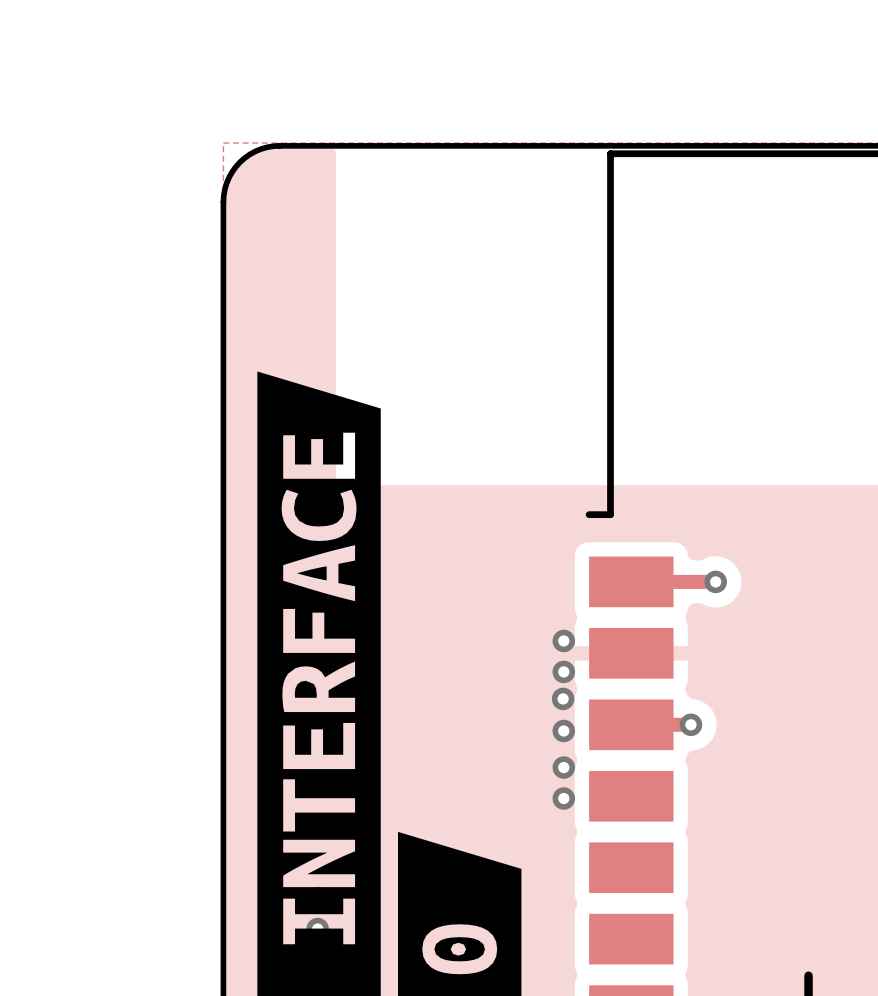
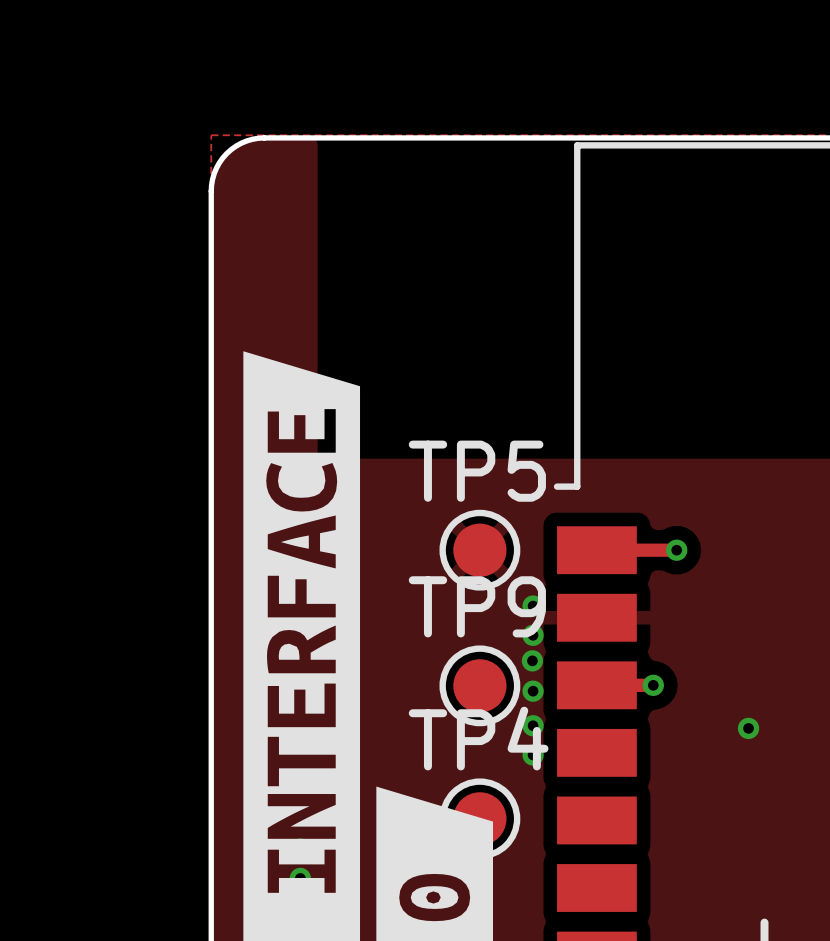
TP5: none -> (479, 550)
TP9: none -> (479, 685)
via: none -> (748, 728)
TP4: none -> (479, 818)

